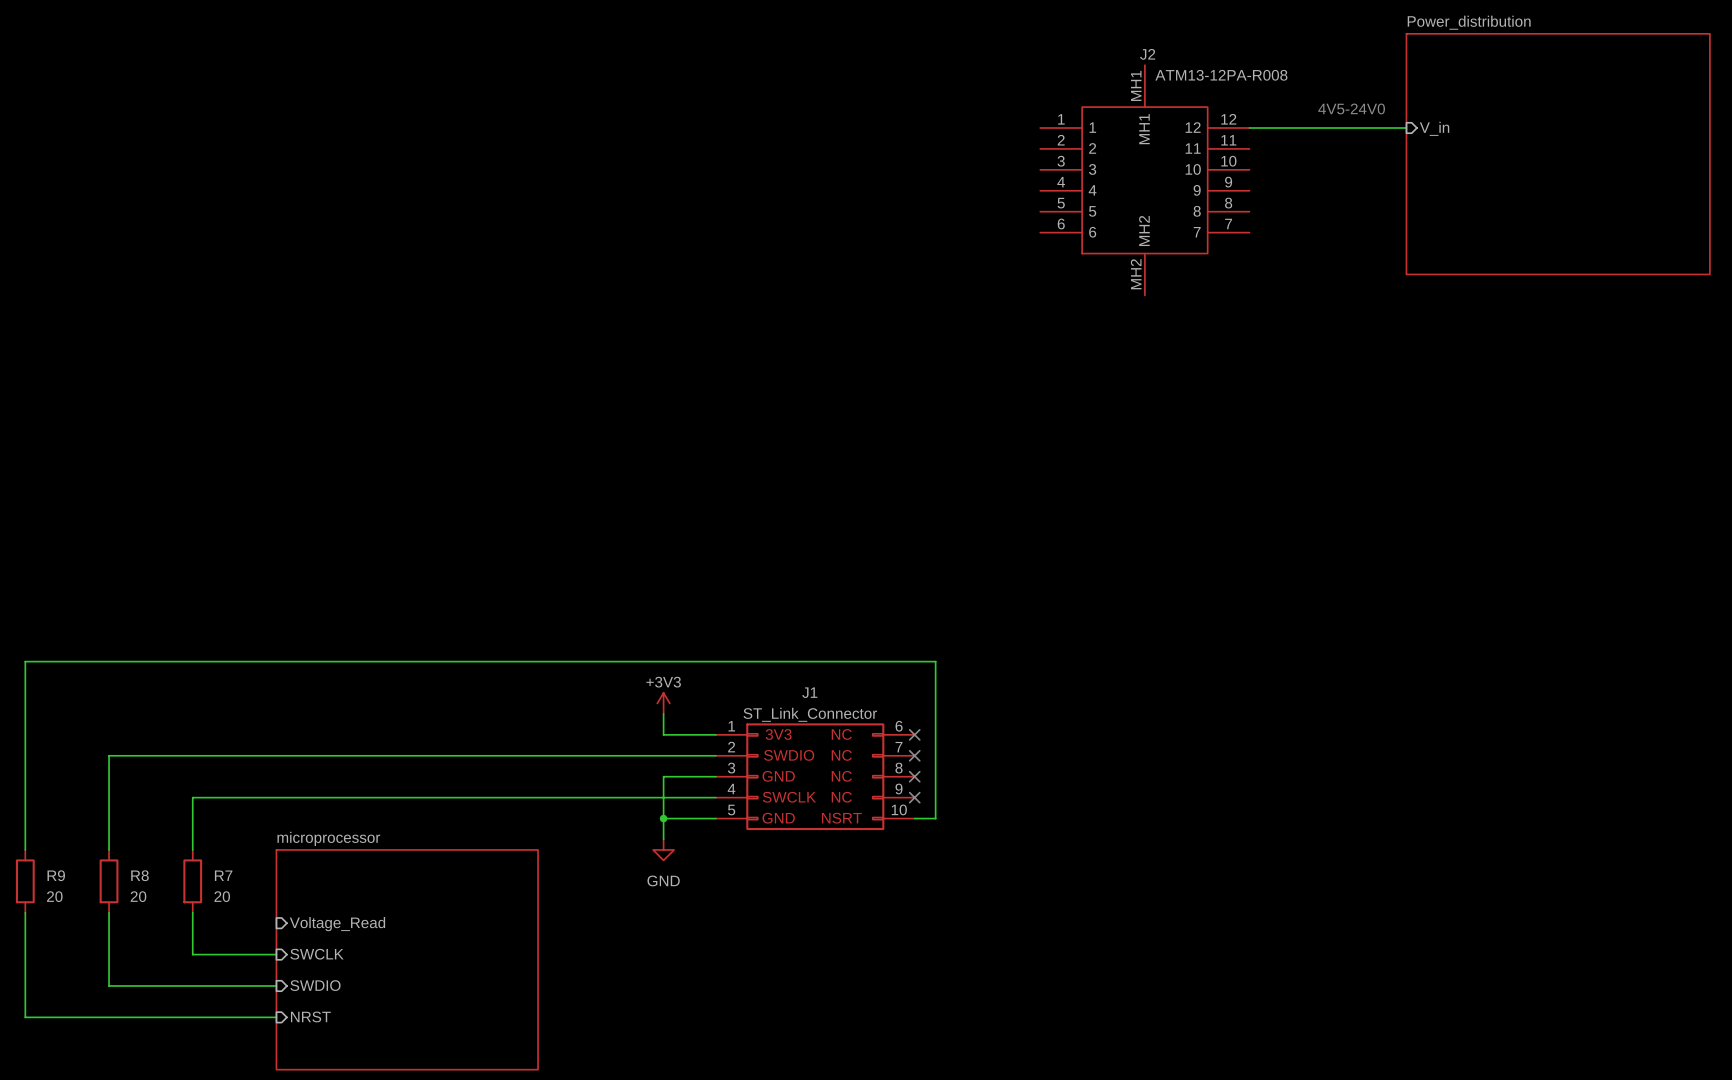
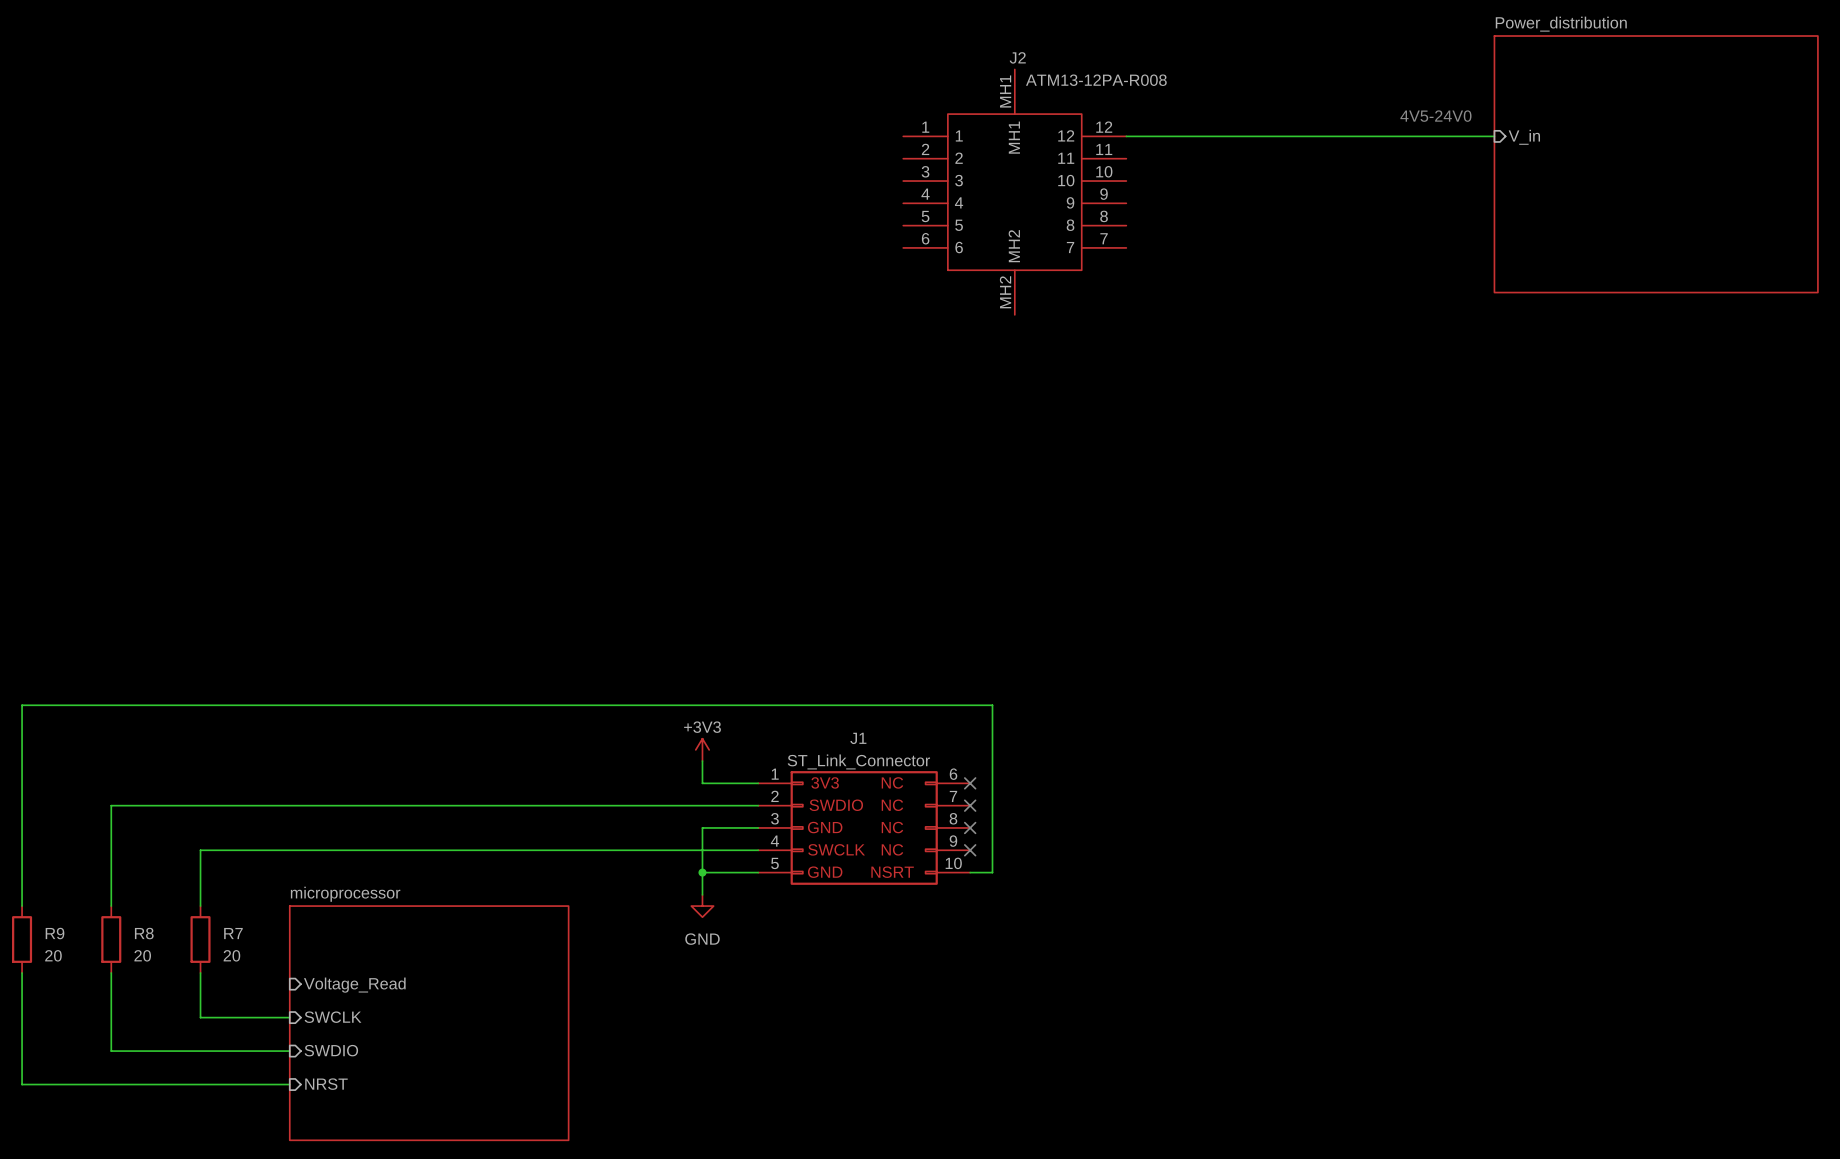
wire: none -> (1126, 136) (1327, 136)
J2 position: (1144, 180) -> (1014, 192)

